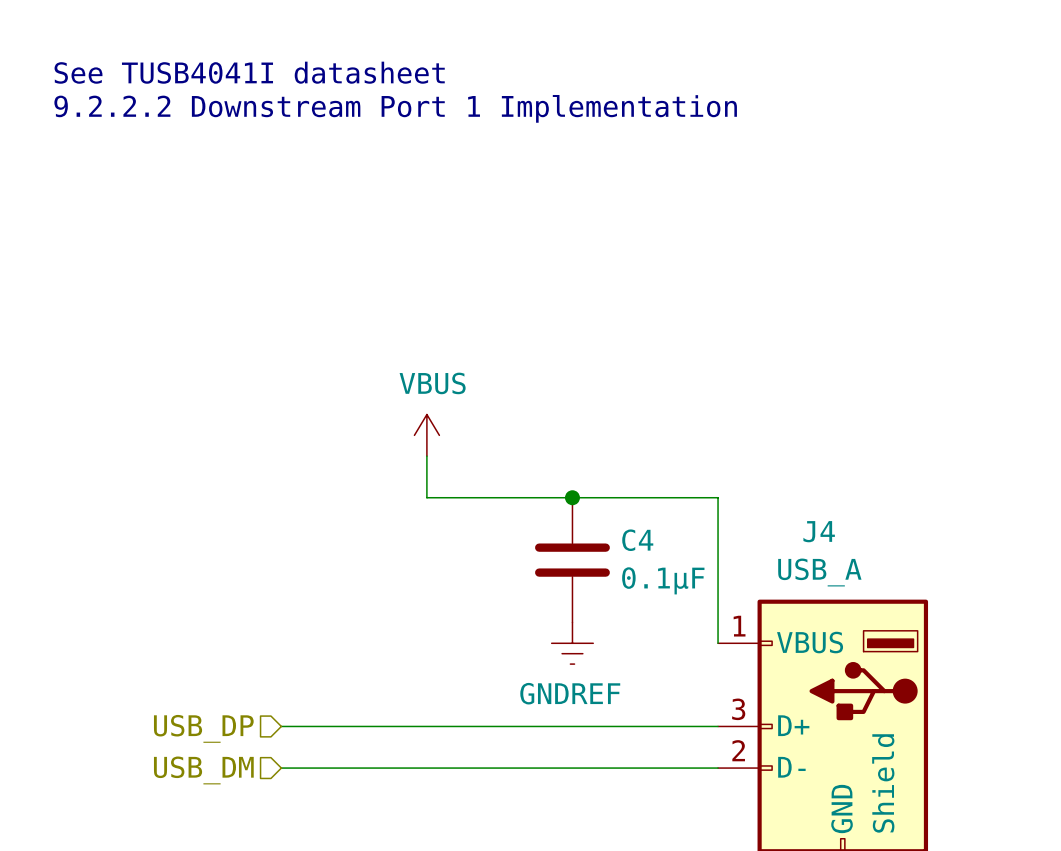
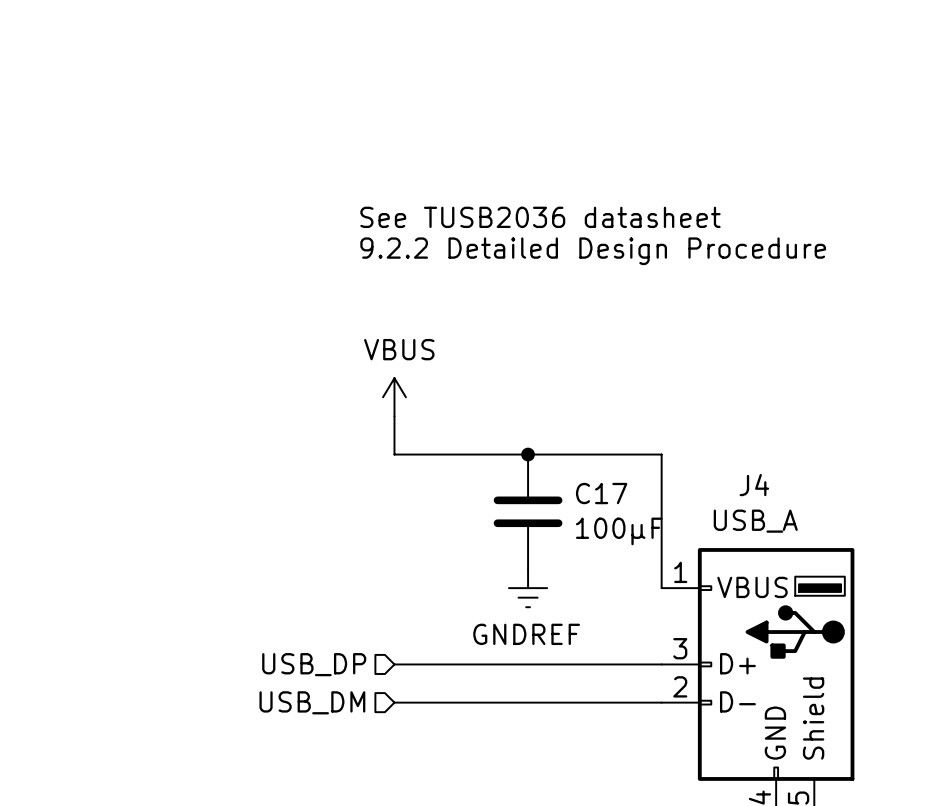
text: See TUSB4041I datasheet (249, 72) -> none
text: 9.2.2.2 Downstream Port 1 Implementation (395, 108) -> none
text: none -> See TUSB2036 datasheet (540, 217)
text: none -> 9.2.2 Detailed Design Procedure (593, 251)
C4 name: C4 (637, 540) -> C17 (601, 493)
C4 value: 0.1μF (663, 580) -> 100μF (619, 531)
wire: (281, 726) (426, 726) -> none
hierarchical label position: USB_DP (203, 728) -> USB_DP (314, 664)
wire: (281, 768) (426, 768) -> none
hierarchical label position: USB_DM (203, 770) -> USB_DM (312, 702)

